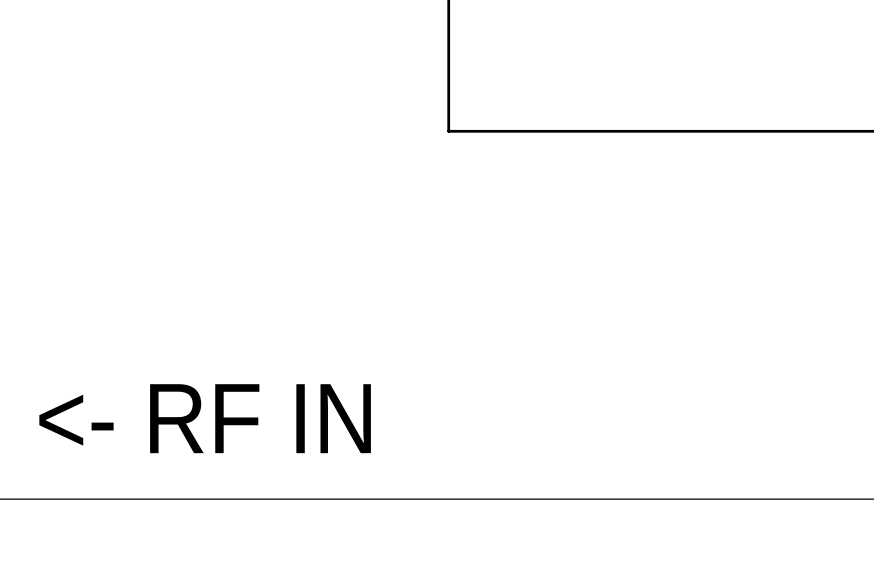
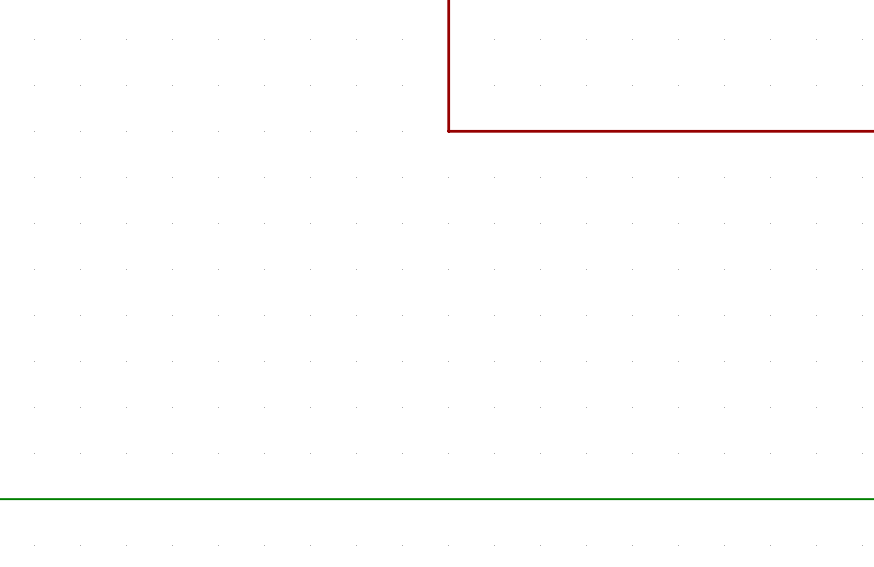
text: <- RF IN (205, 418) -> none

